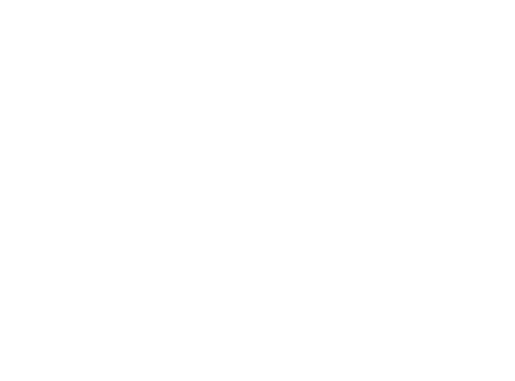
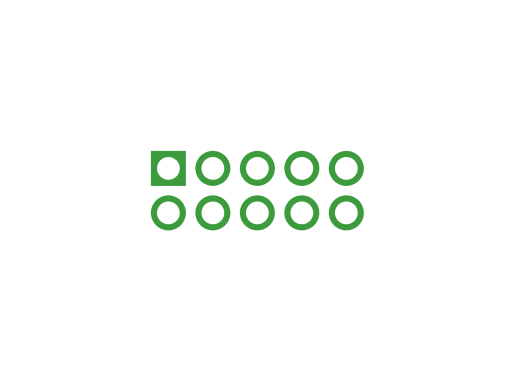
part: none -> (257, 190)

